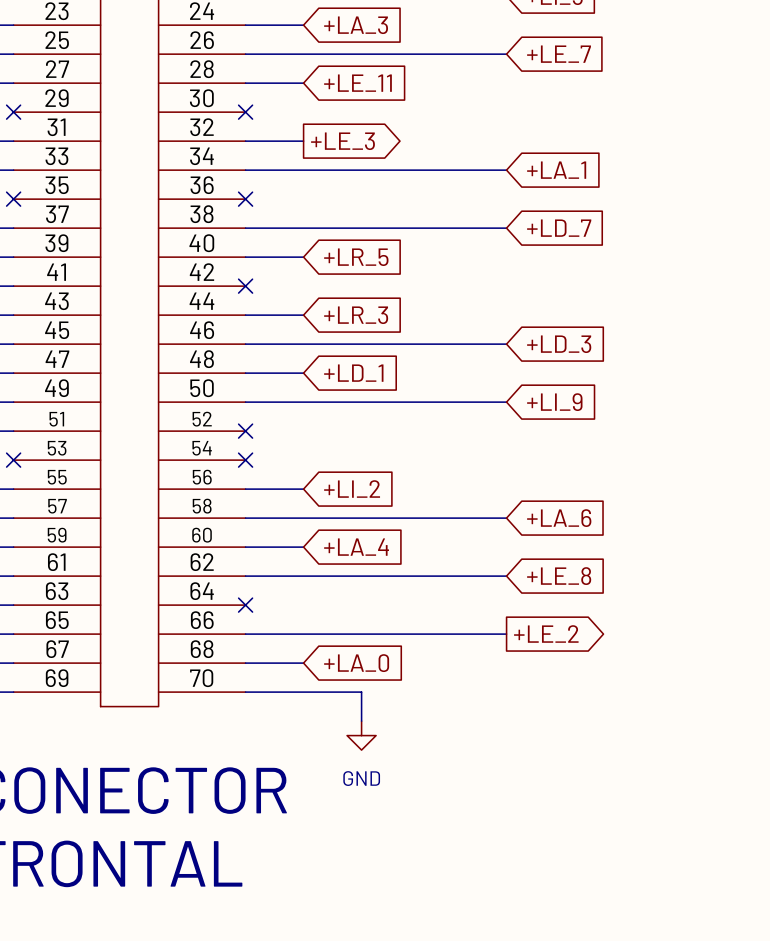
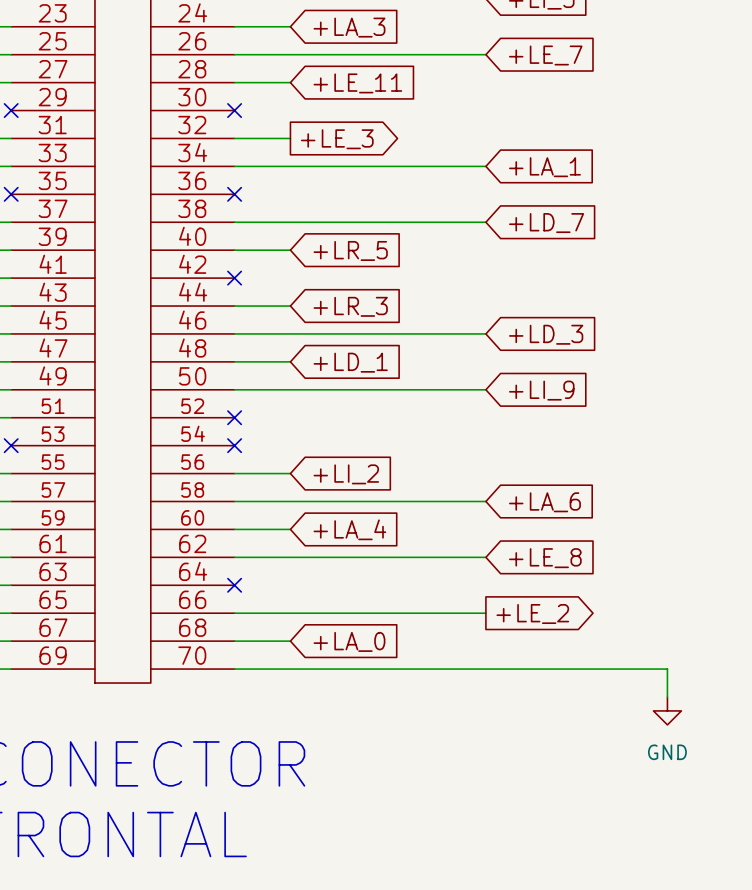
wire: (361, 692) (361, 721) -> (346, 669) (667, 669) (667, 696)
power symbol: GND (361, 735) -> none
power symbol: none -> GND (667, 710)

